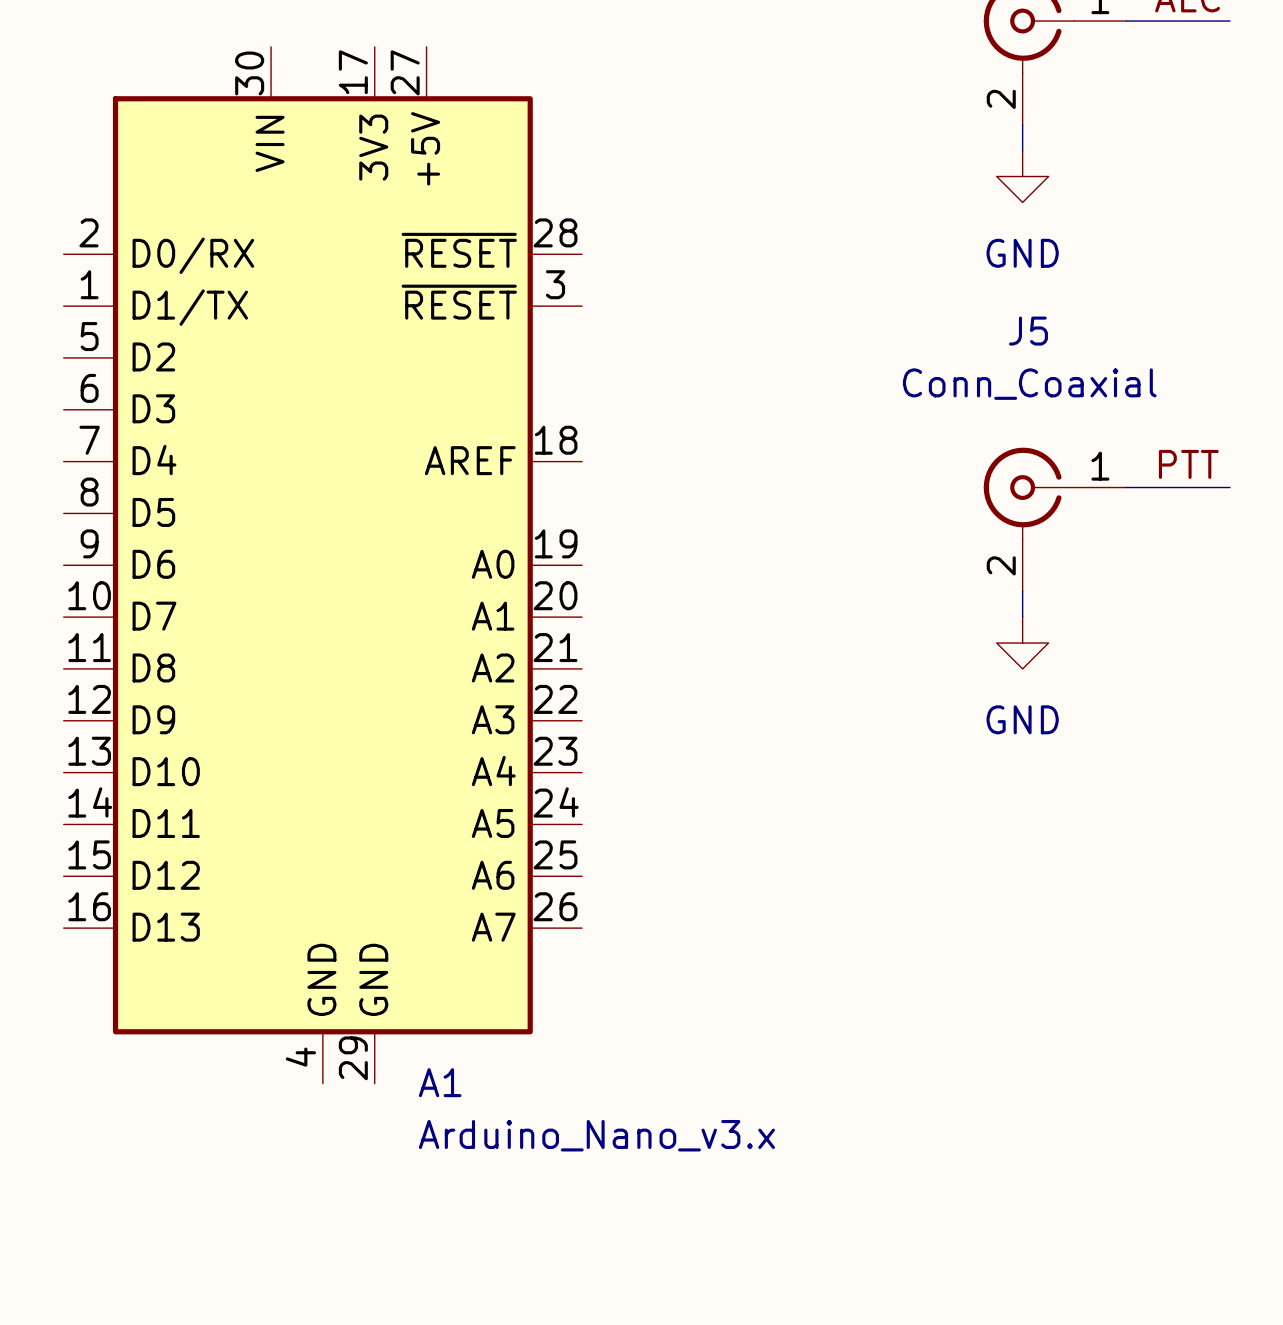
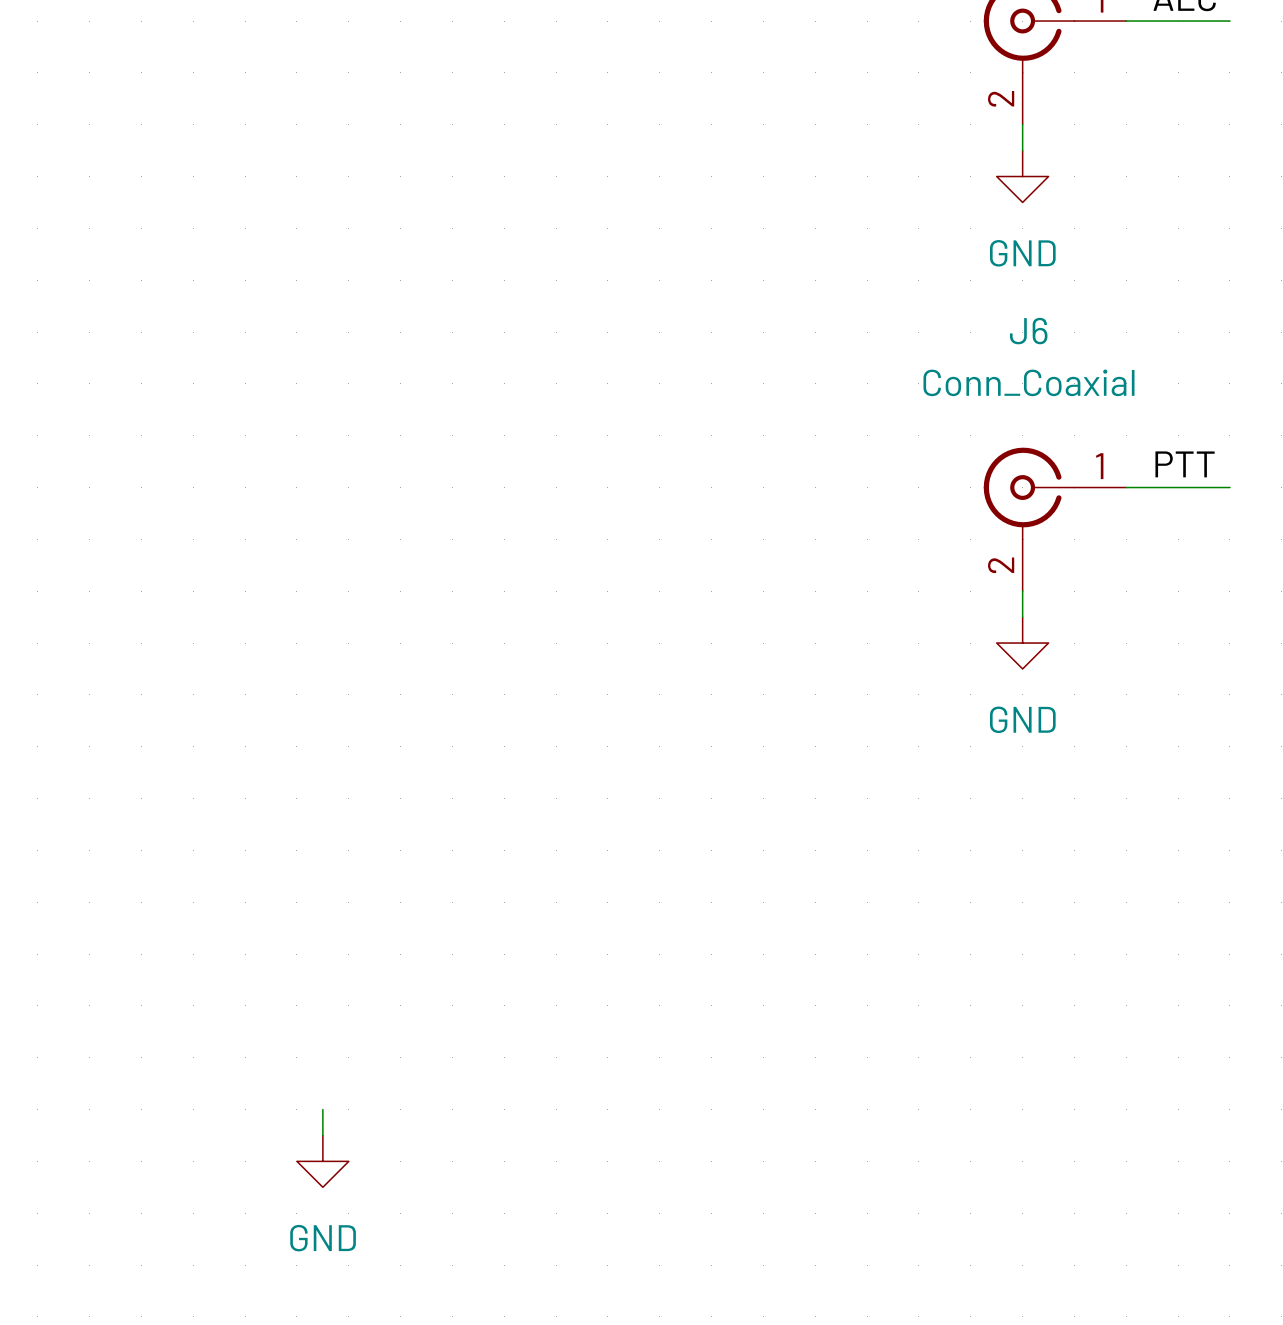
J5 name: J5 (1028, 331) -> J6 (1028, 331)
A1: Arduino_Nano_v3.x (322, 565) -> none
wire: none -> (322, 1109) (322, 1135)
power symbol: none -> GND (322, 1161)

